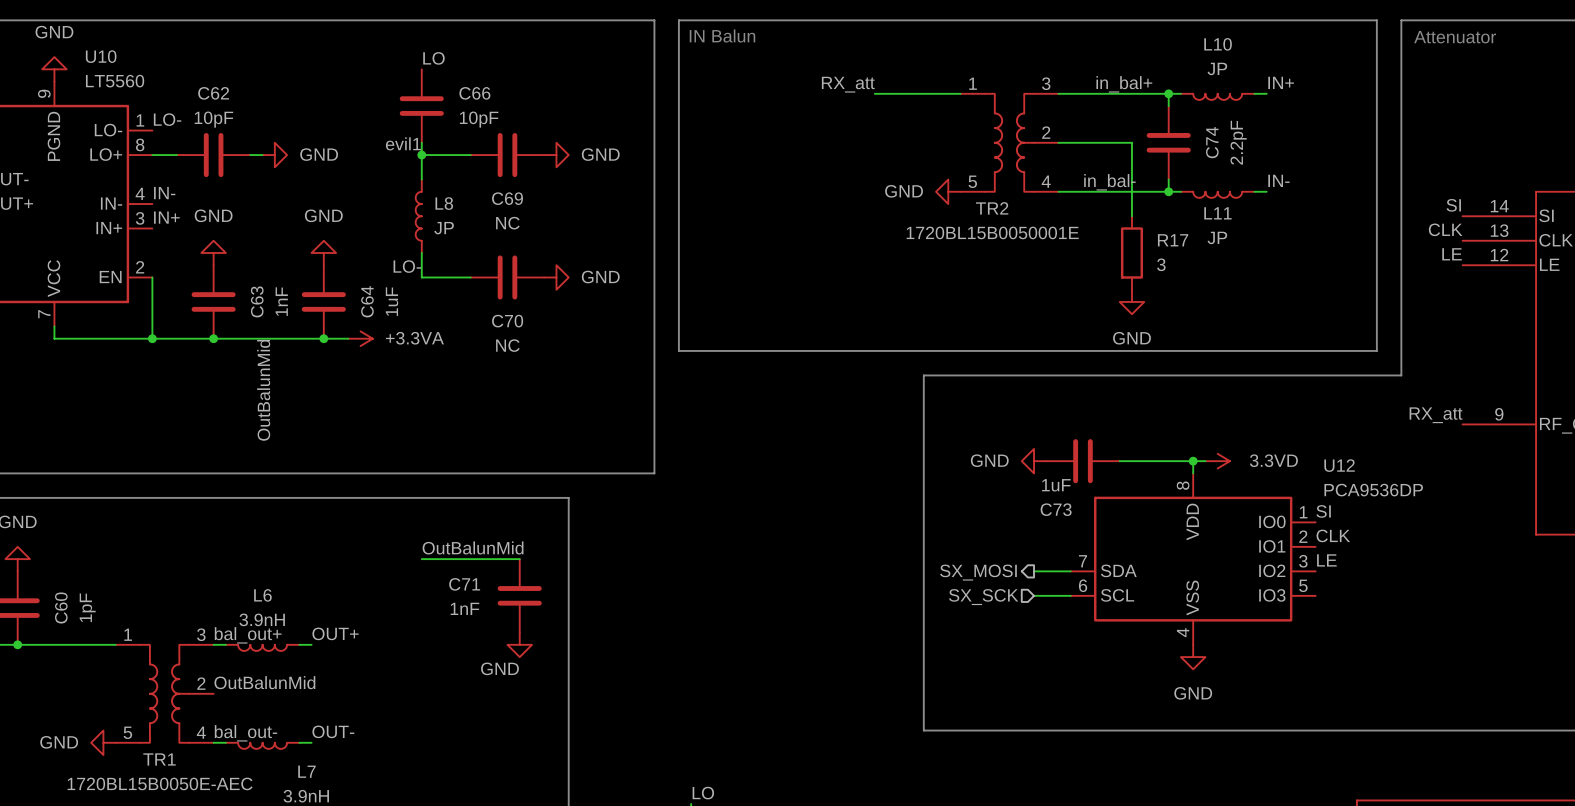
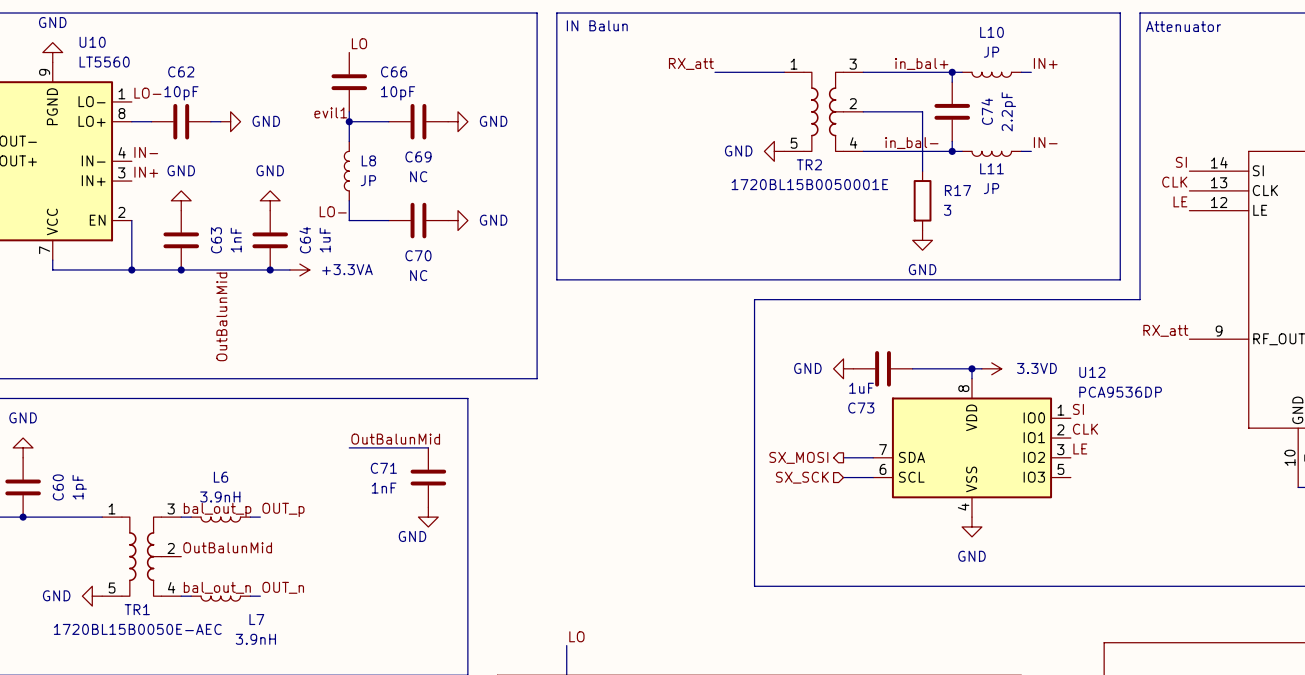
label: OUT+ (335, 633) -> OUT_p (283, 509)
label: bal_out+ (248, 635) -> bal_out_p (217, 509)
label: OUT- (333, 731) -> OUT_n (283, 587)
label: bal_out- (245, 733) -> bal_out_n (217, 587)

